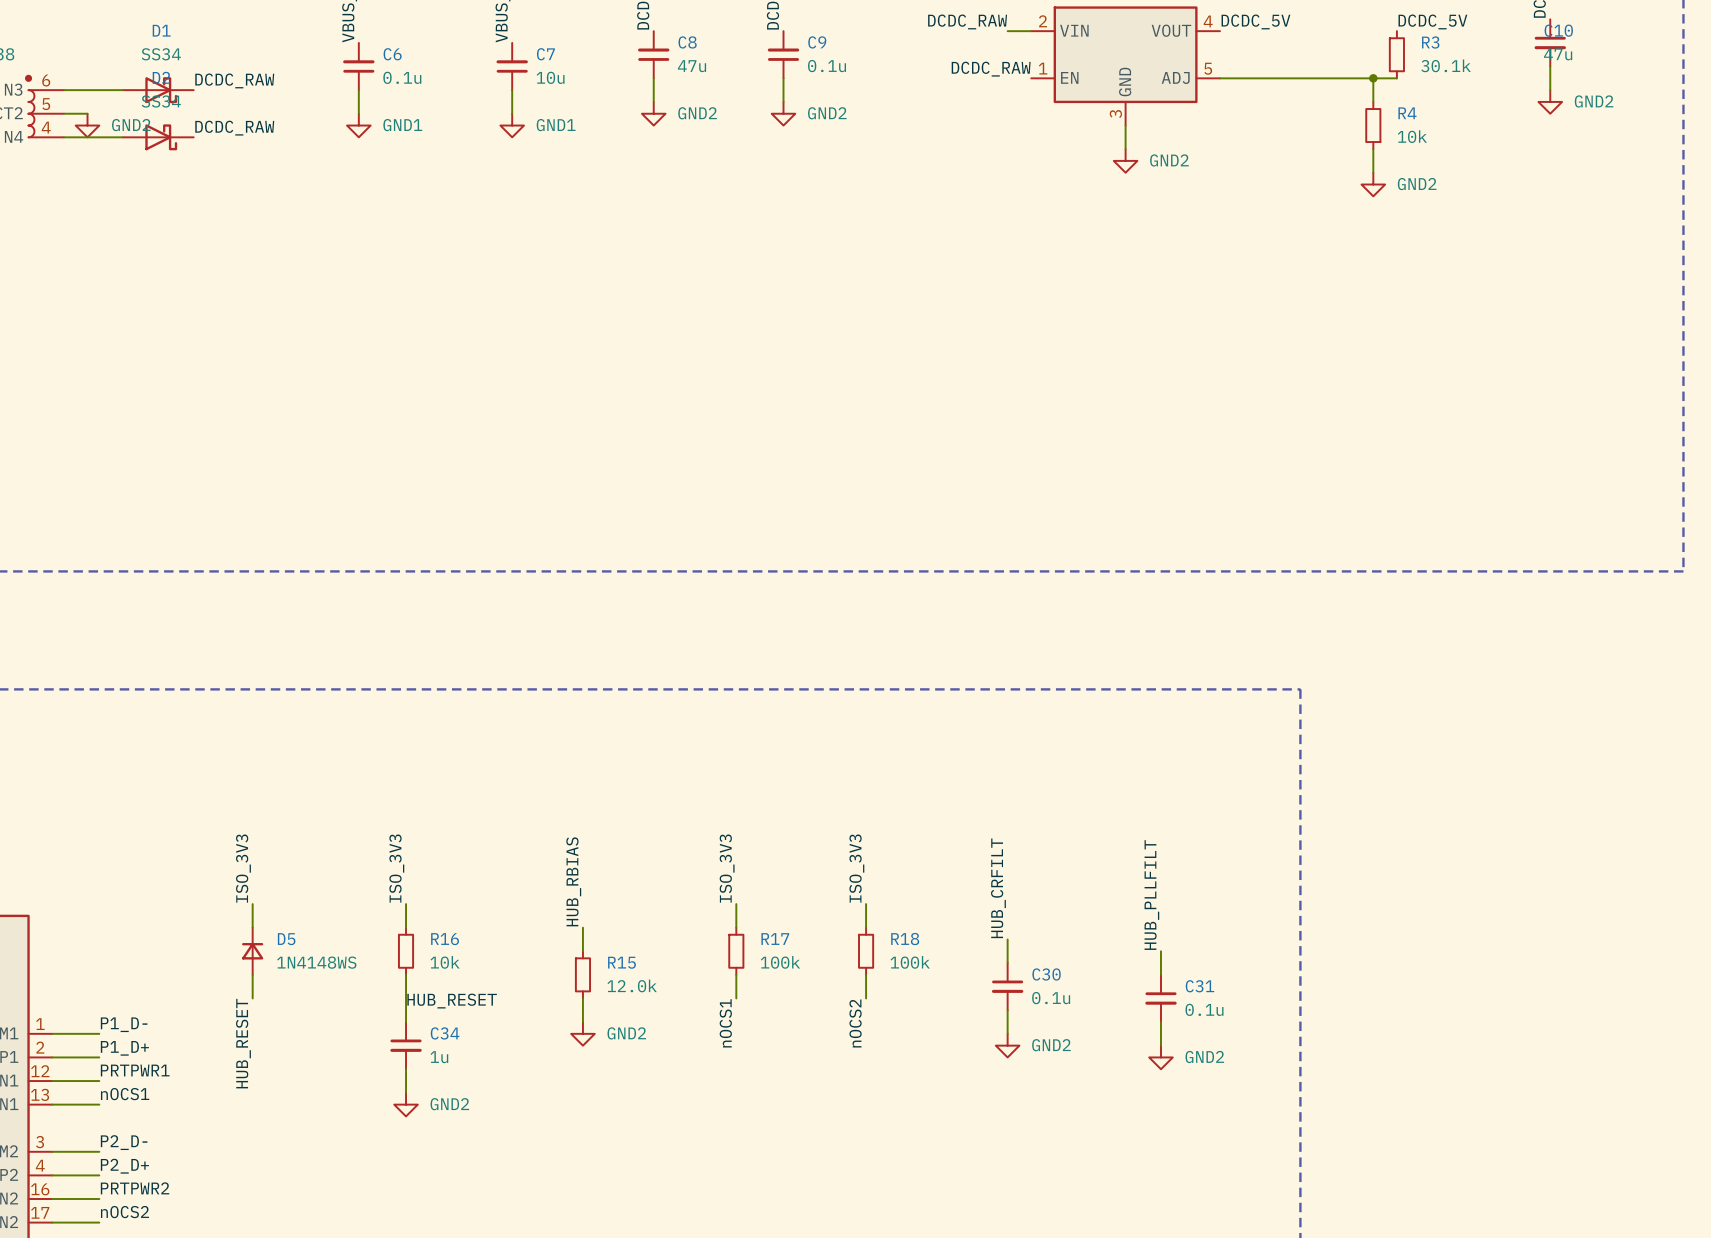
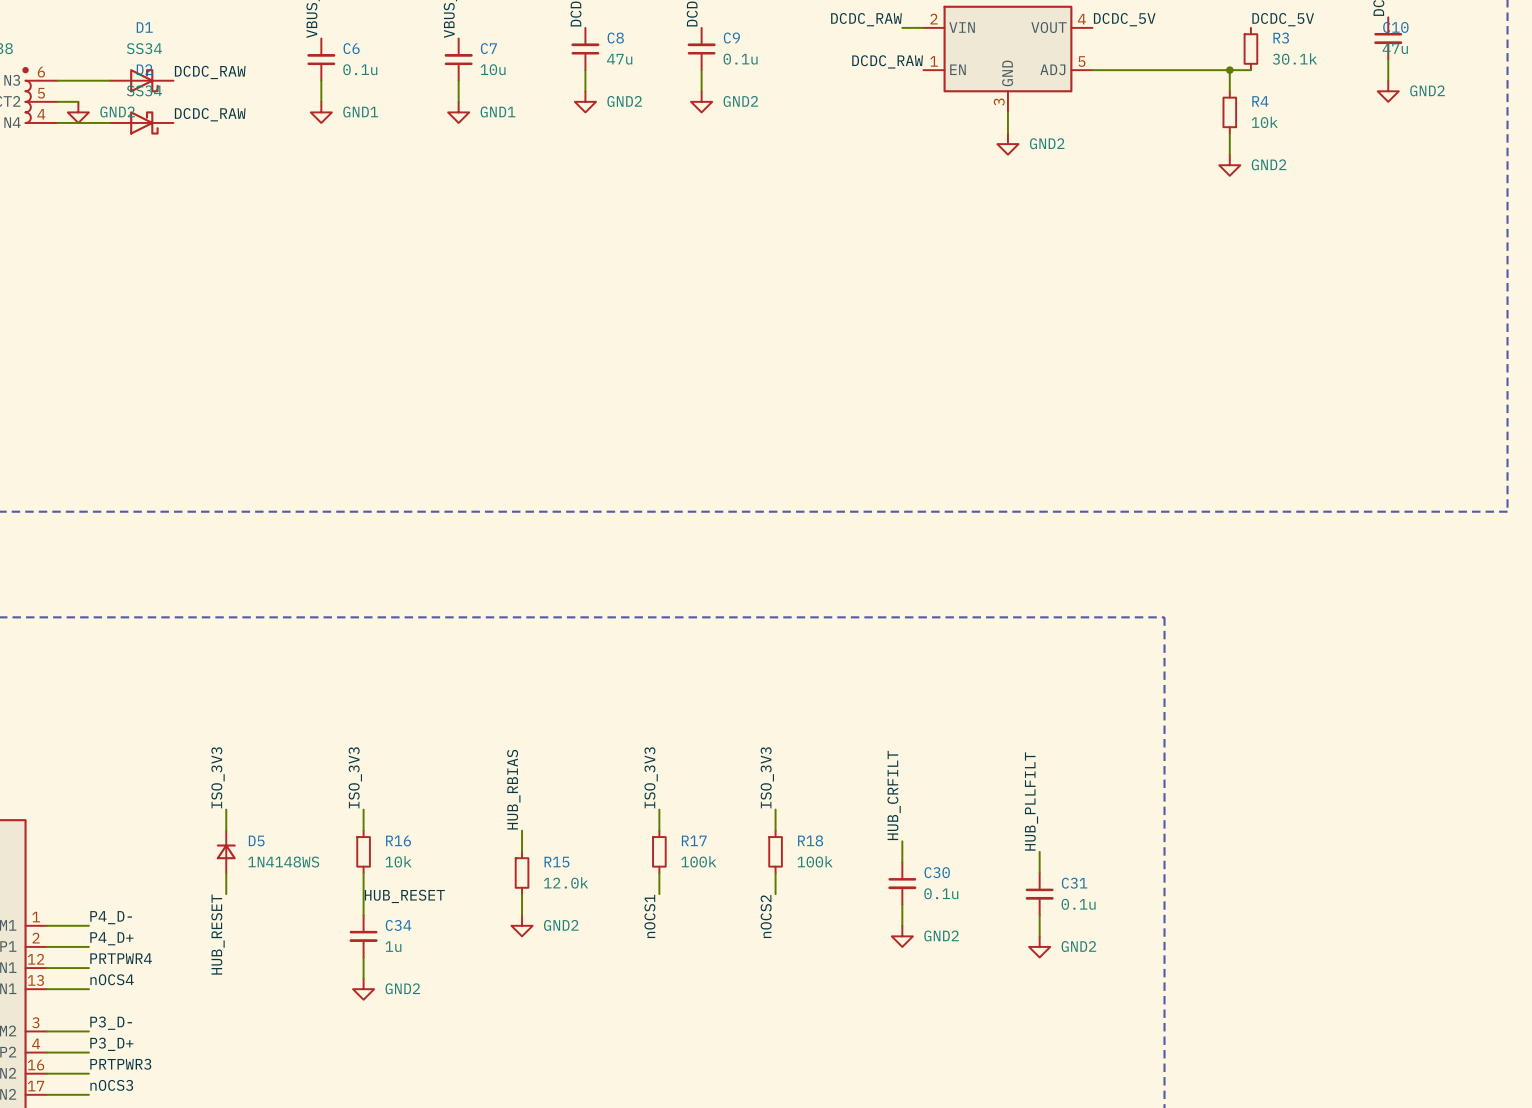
label: P1_D- (124, 1024) -> P4_D- (111, 917)
label: P1_D+ (124, 1048) -> P4_D+ (111, 938)
label: PRTPWR1 (135, 1070) -> PRTPWR4 (121, 958)
label: nOCS1 (125, 1094) -> nOCS4 (112, 979)
label: P2_D- (124, 1142) -> P3_D- (111, 1023)
label: P2_D+ (124, 1166) -> P3_D+ (111, 1044)
label: PRTPWR2 (135, 1188) -> PRTPWR3 (120, 1064)
label: nOCS2 (124, 1212) -> nOCS3 (111, 1085)

